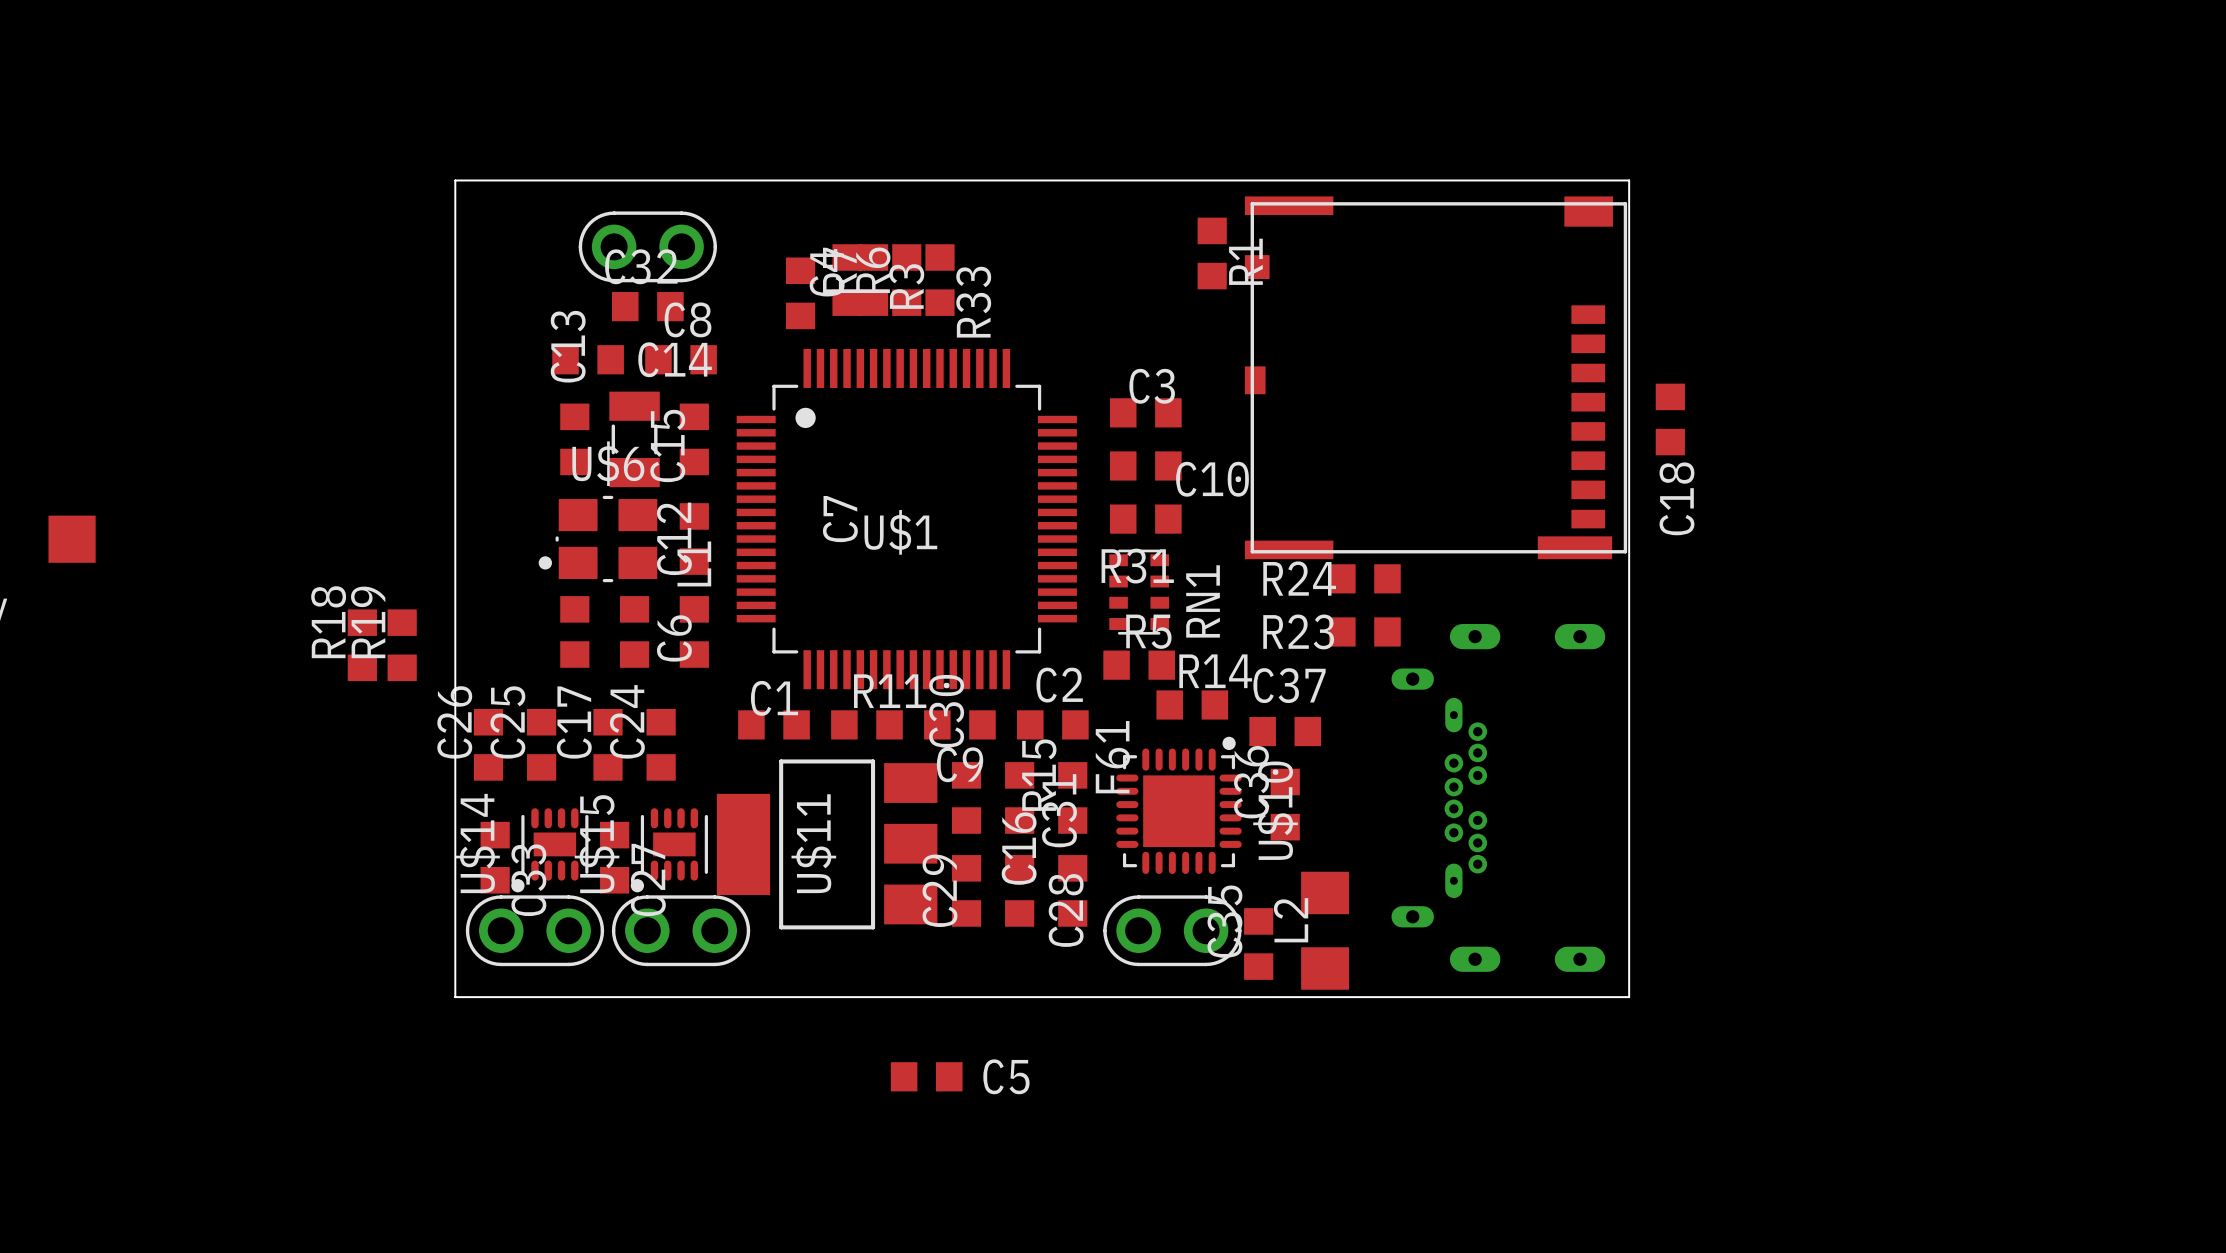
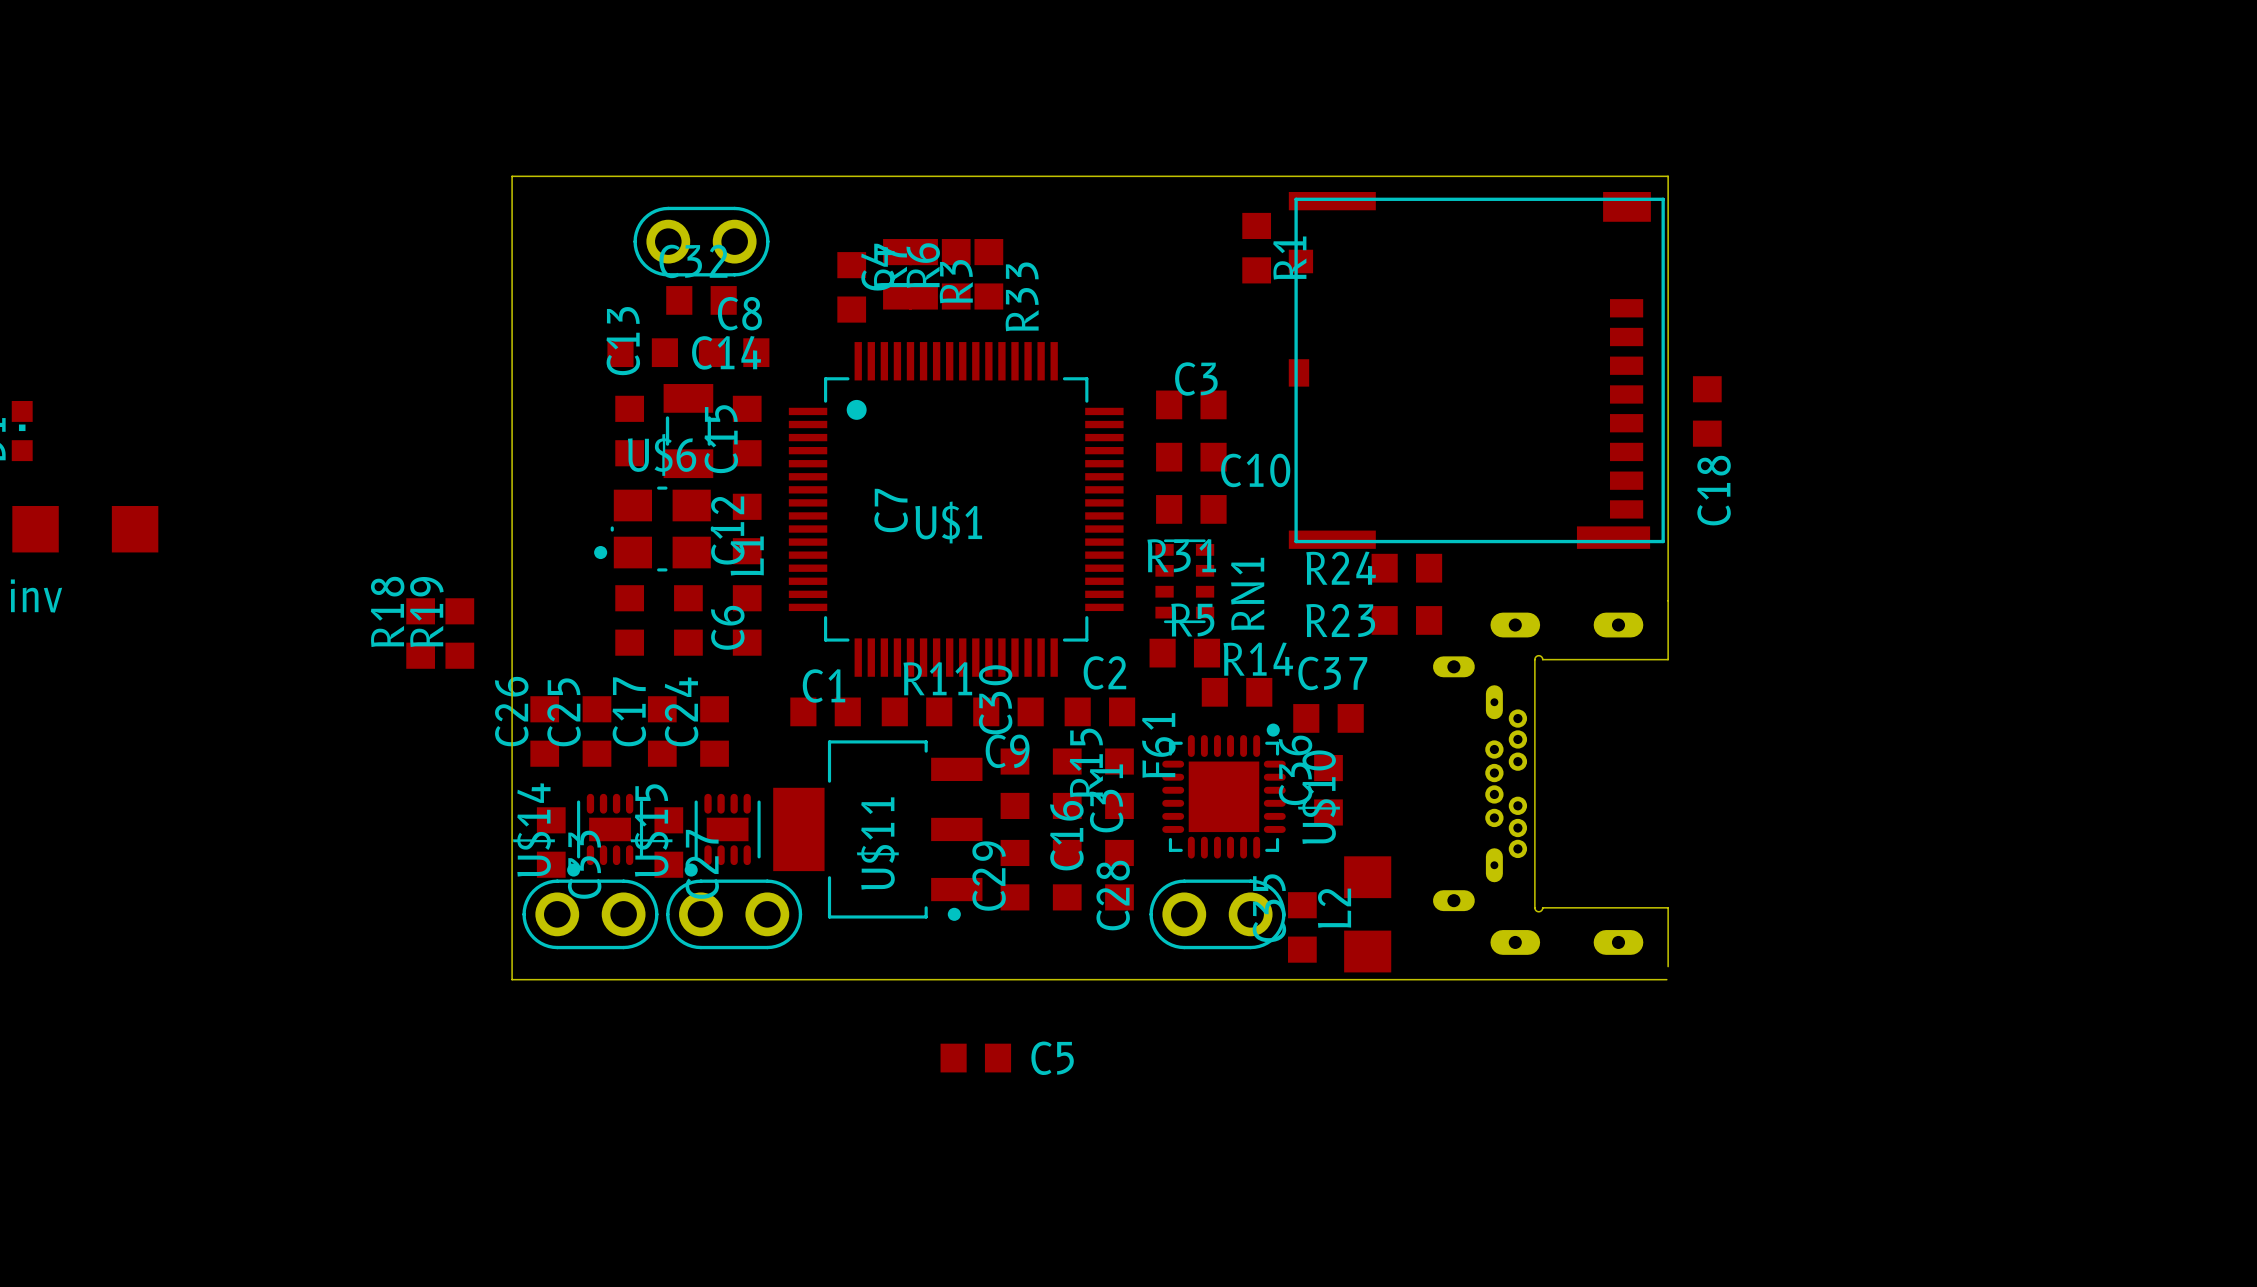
board edge: (1629, 180) (1629, 997) -> (1666, 176) (1668, 600)
part footprint: [1391, 623, 1606, 972] -> [1433, 600, 1669, 967]
U$11 footprint: [716, 759, 938, 930] -> [773, 740, 983, 921]

